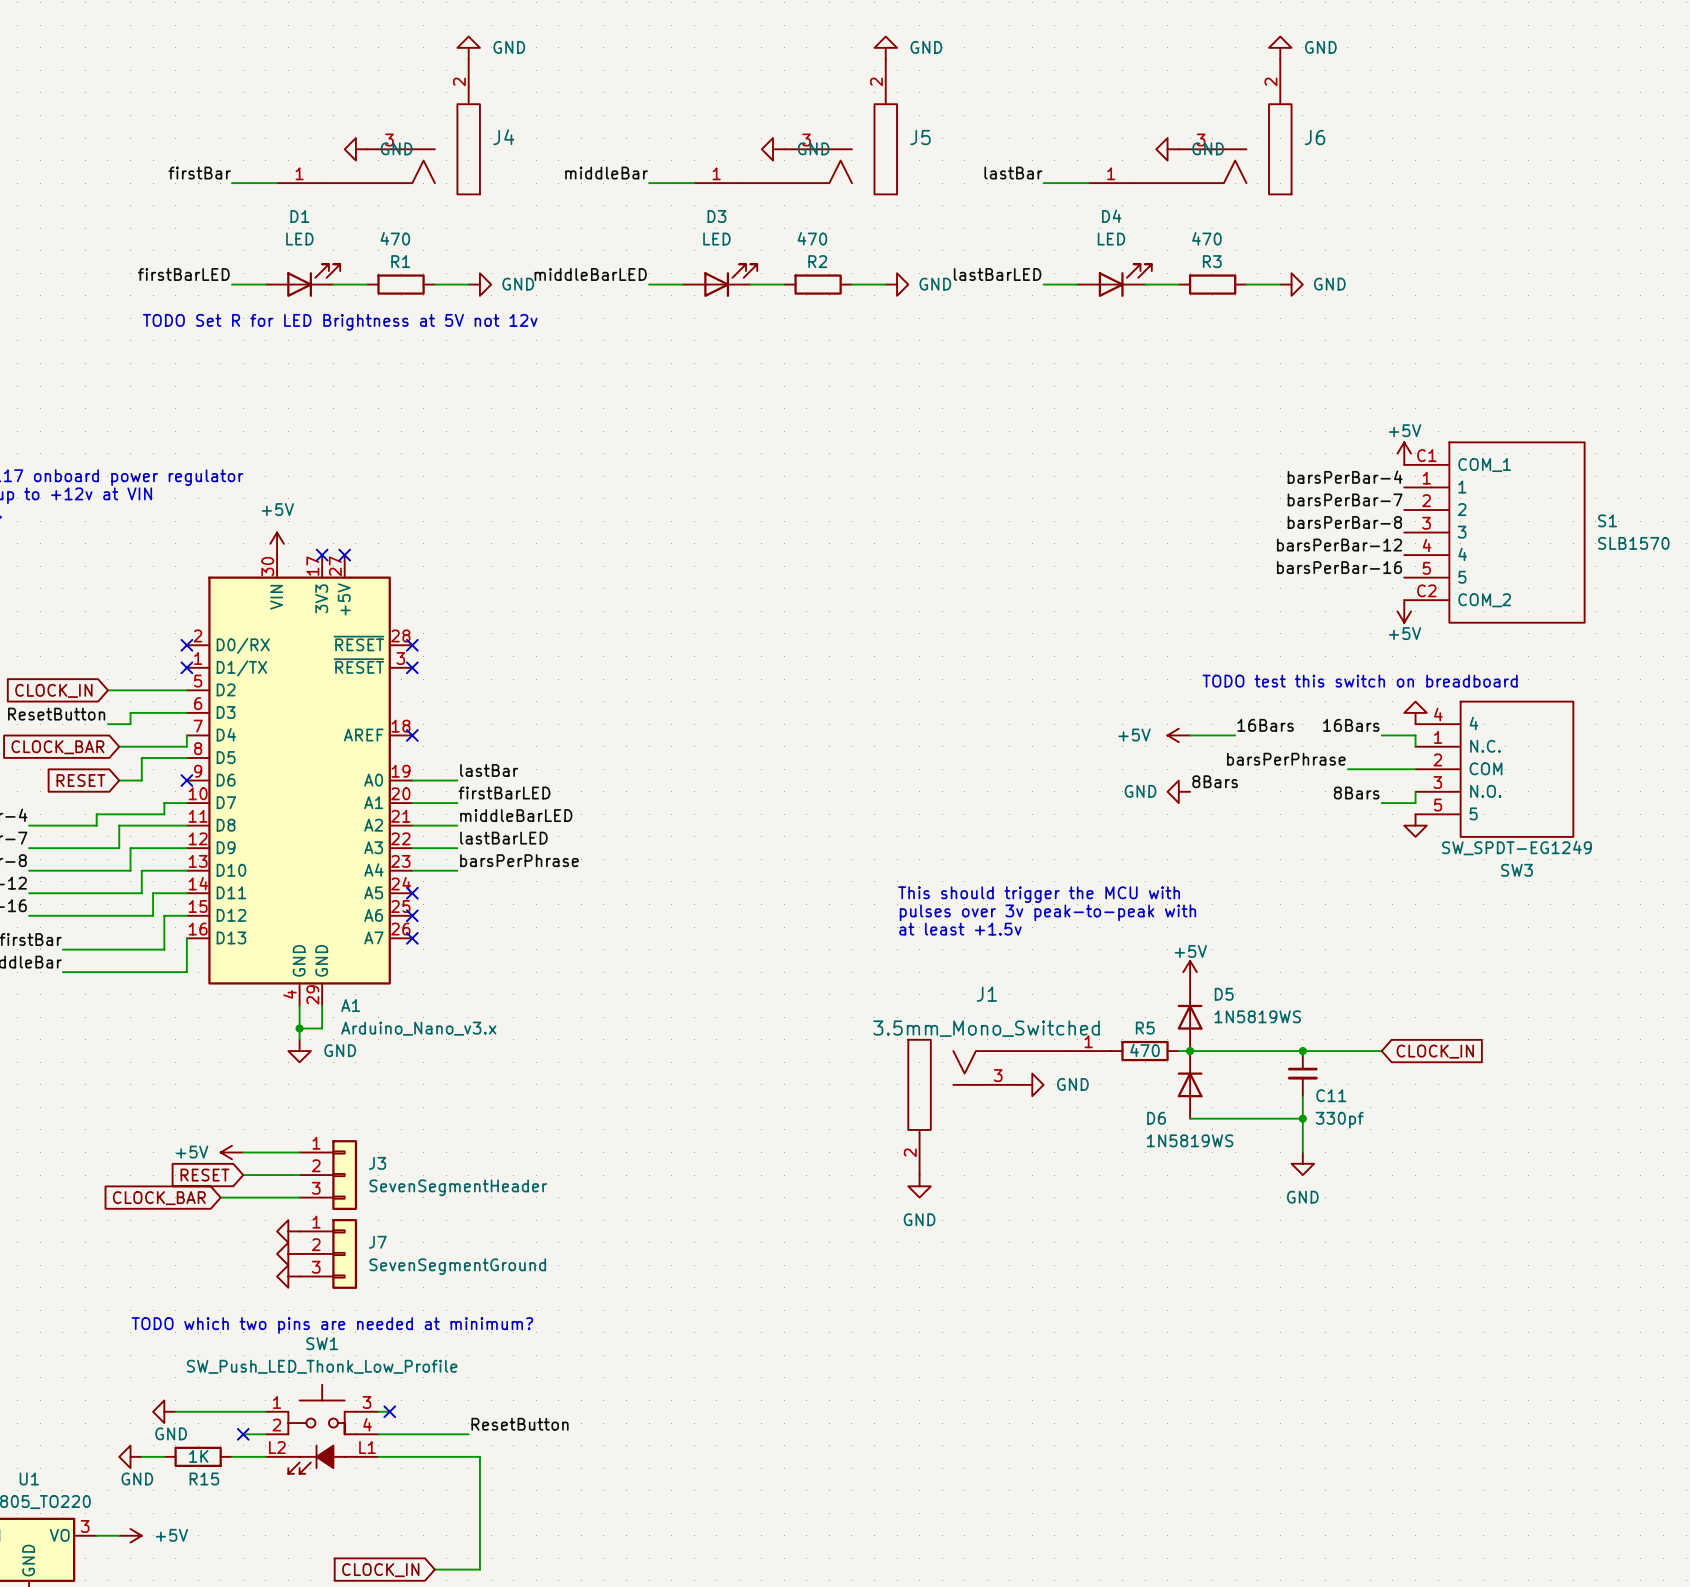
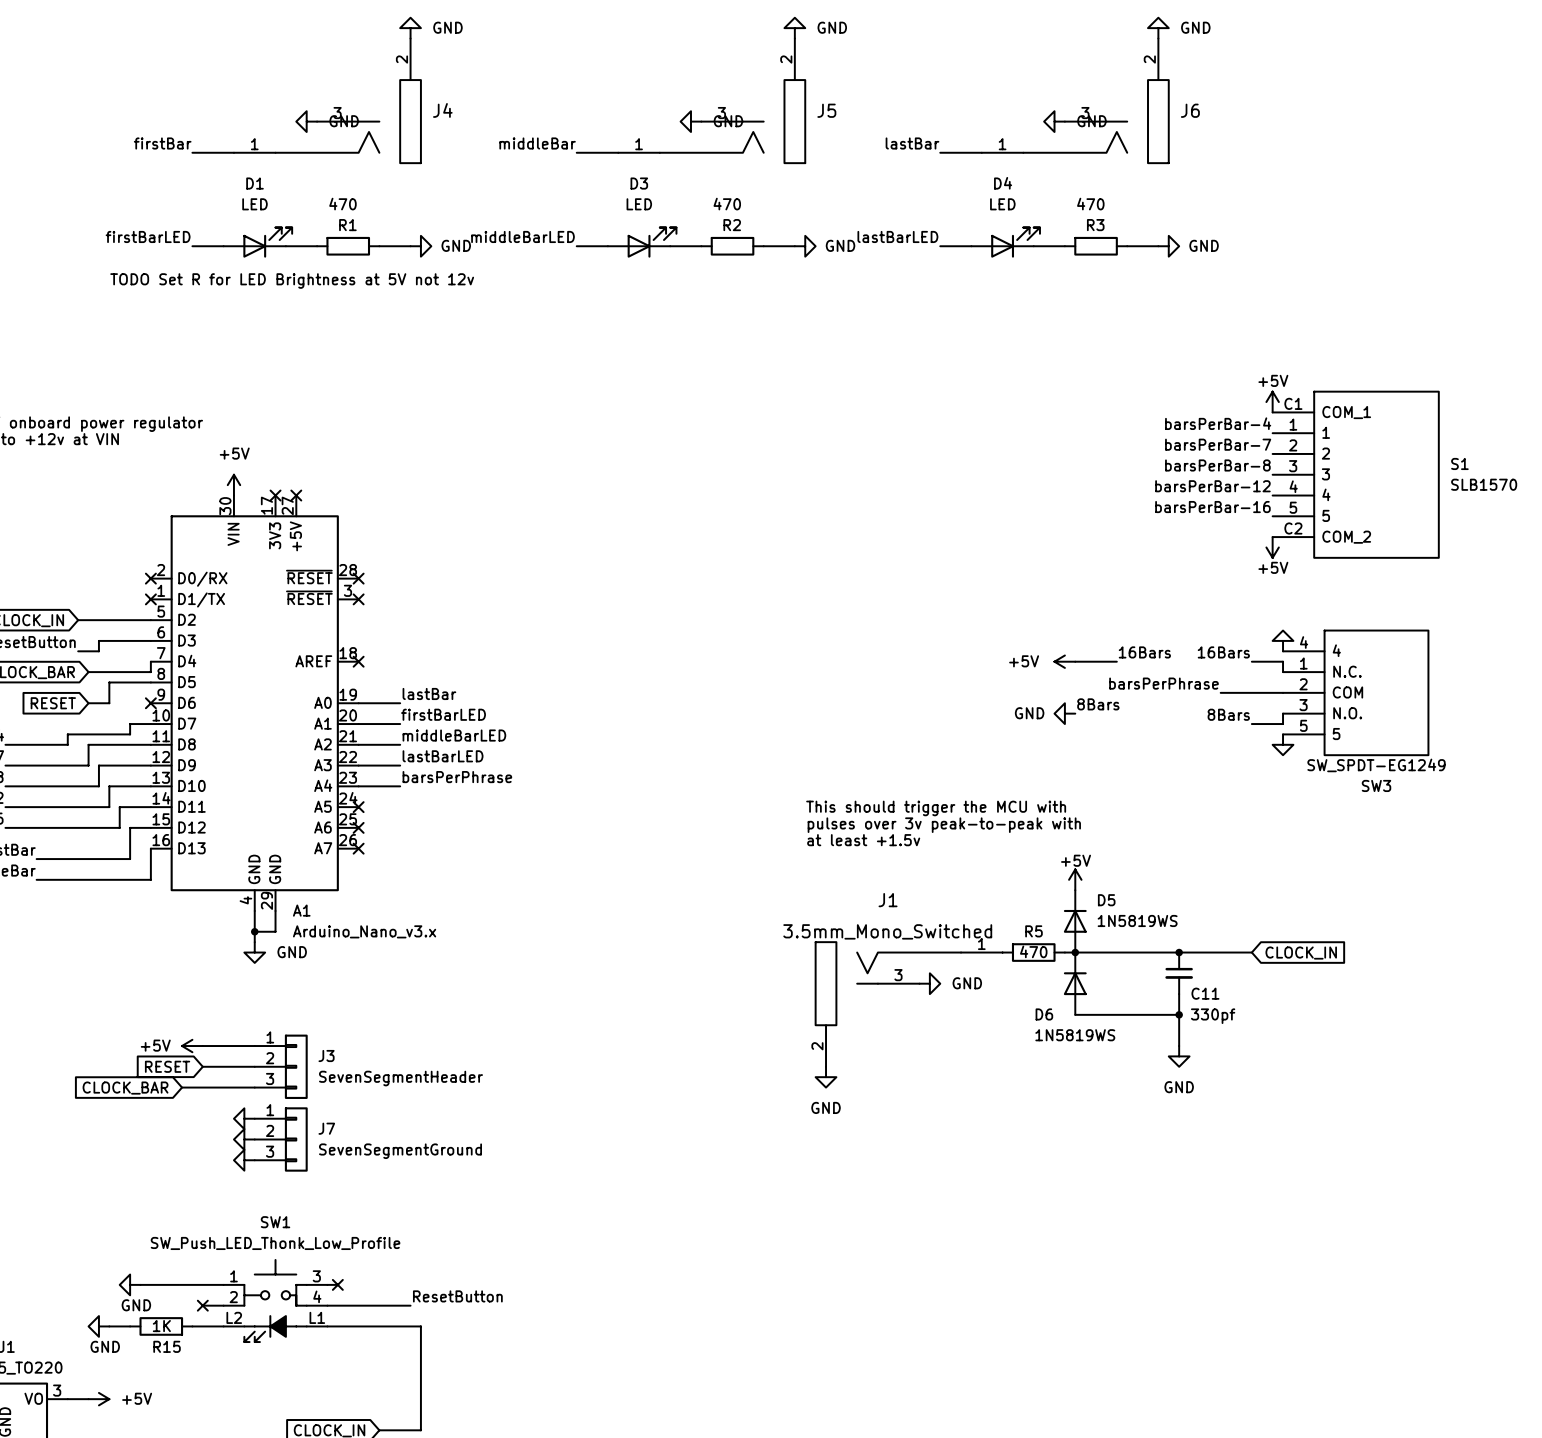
text: TODO test this switch on breadboard (1360, 681) -> none
text: TODO which two pins are needed at minimum? (332, 1325) -> none

